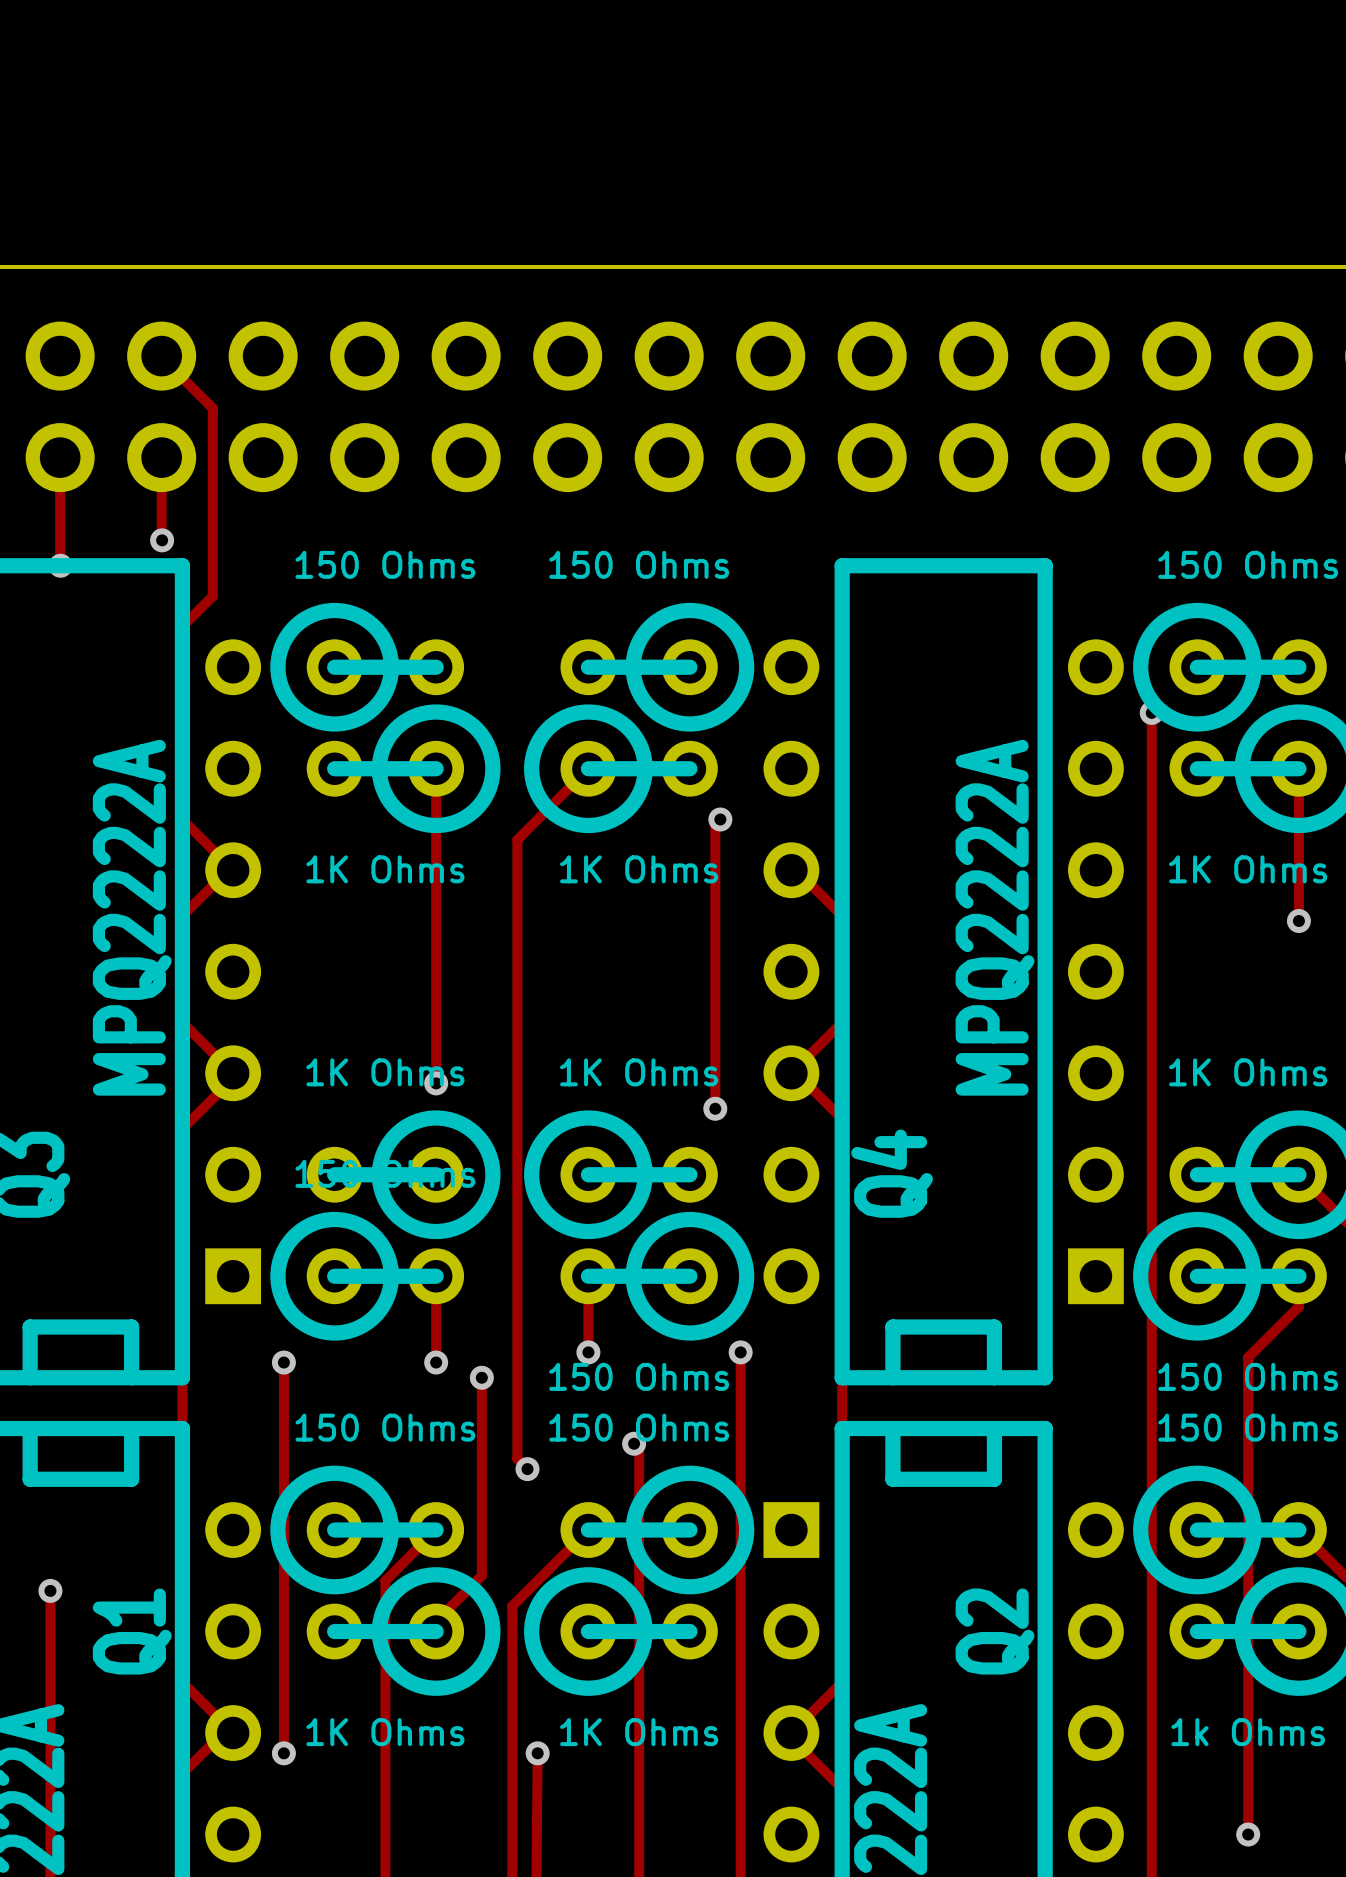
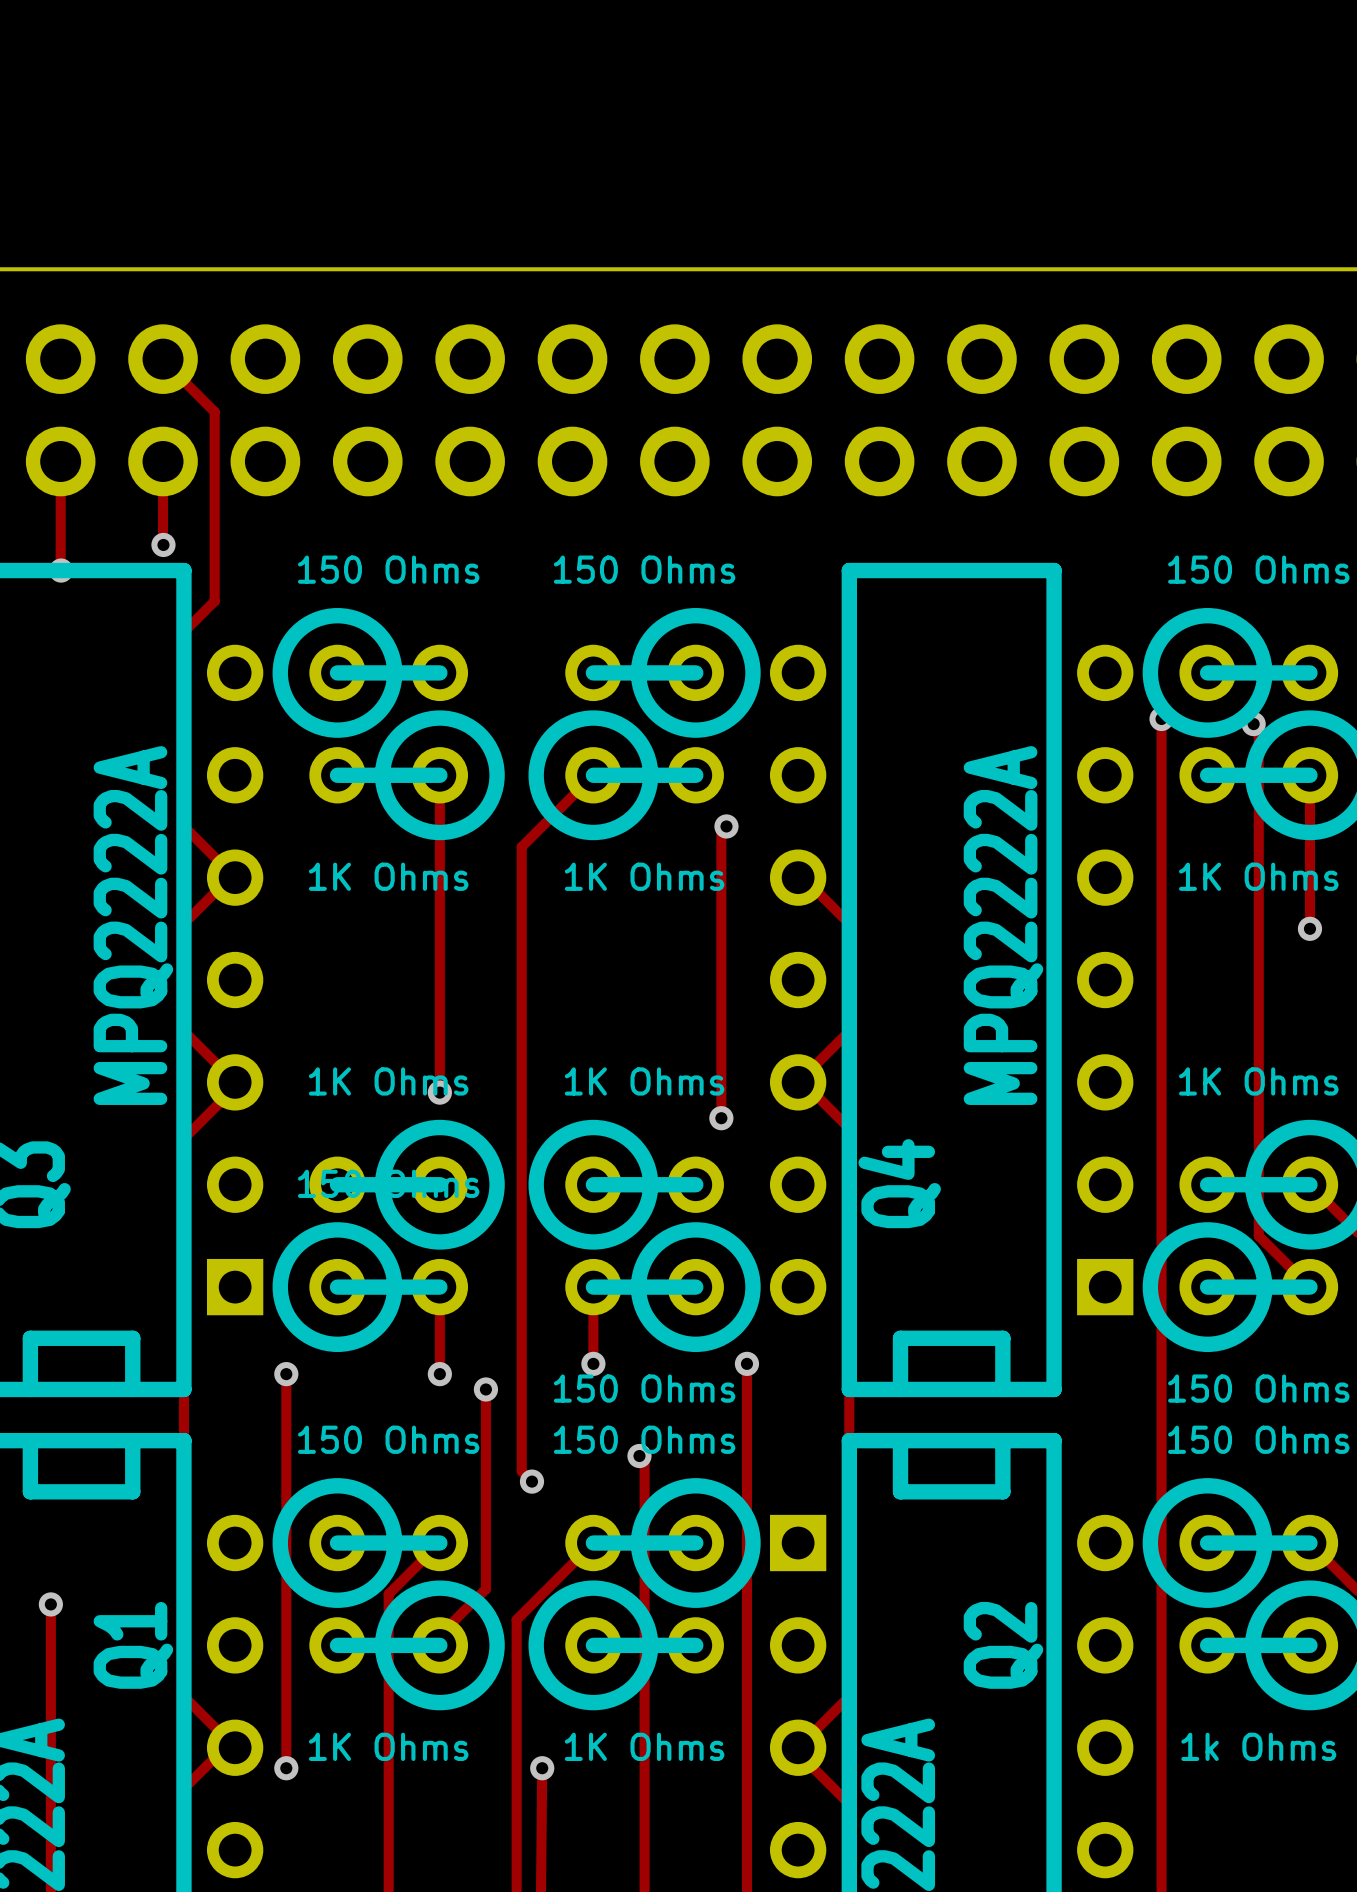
via: none -> (1253, 724)
track: (1298, 1276) (1298, 1306) (1248, 1357) (1248, 1834) -> (1309, 1287) (1258, 1235) (1258, 729) (1253, 724)
via: (1248, 1834) -> none

